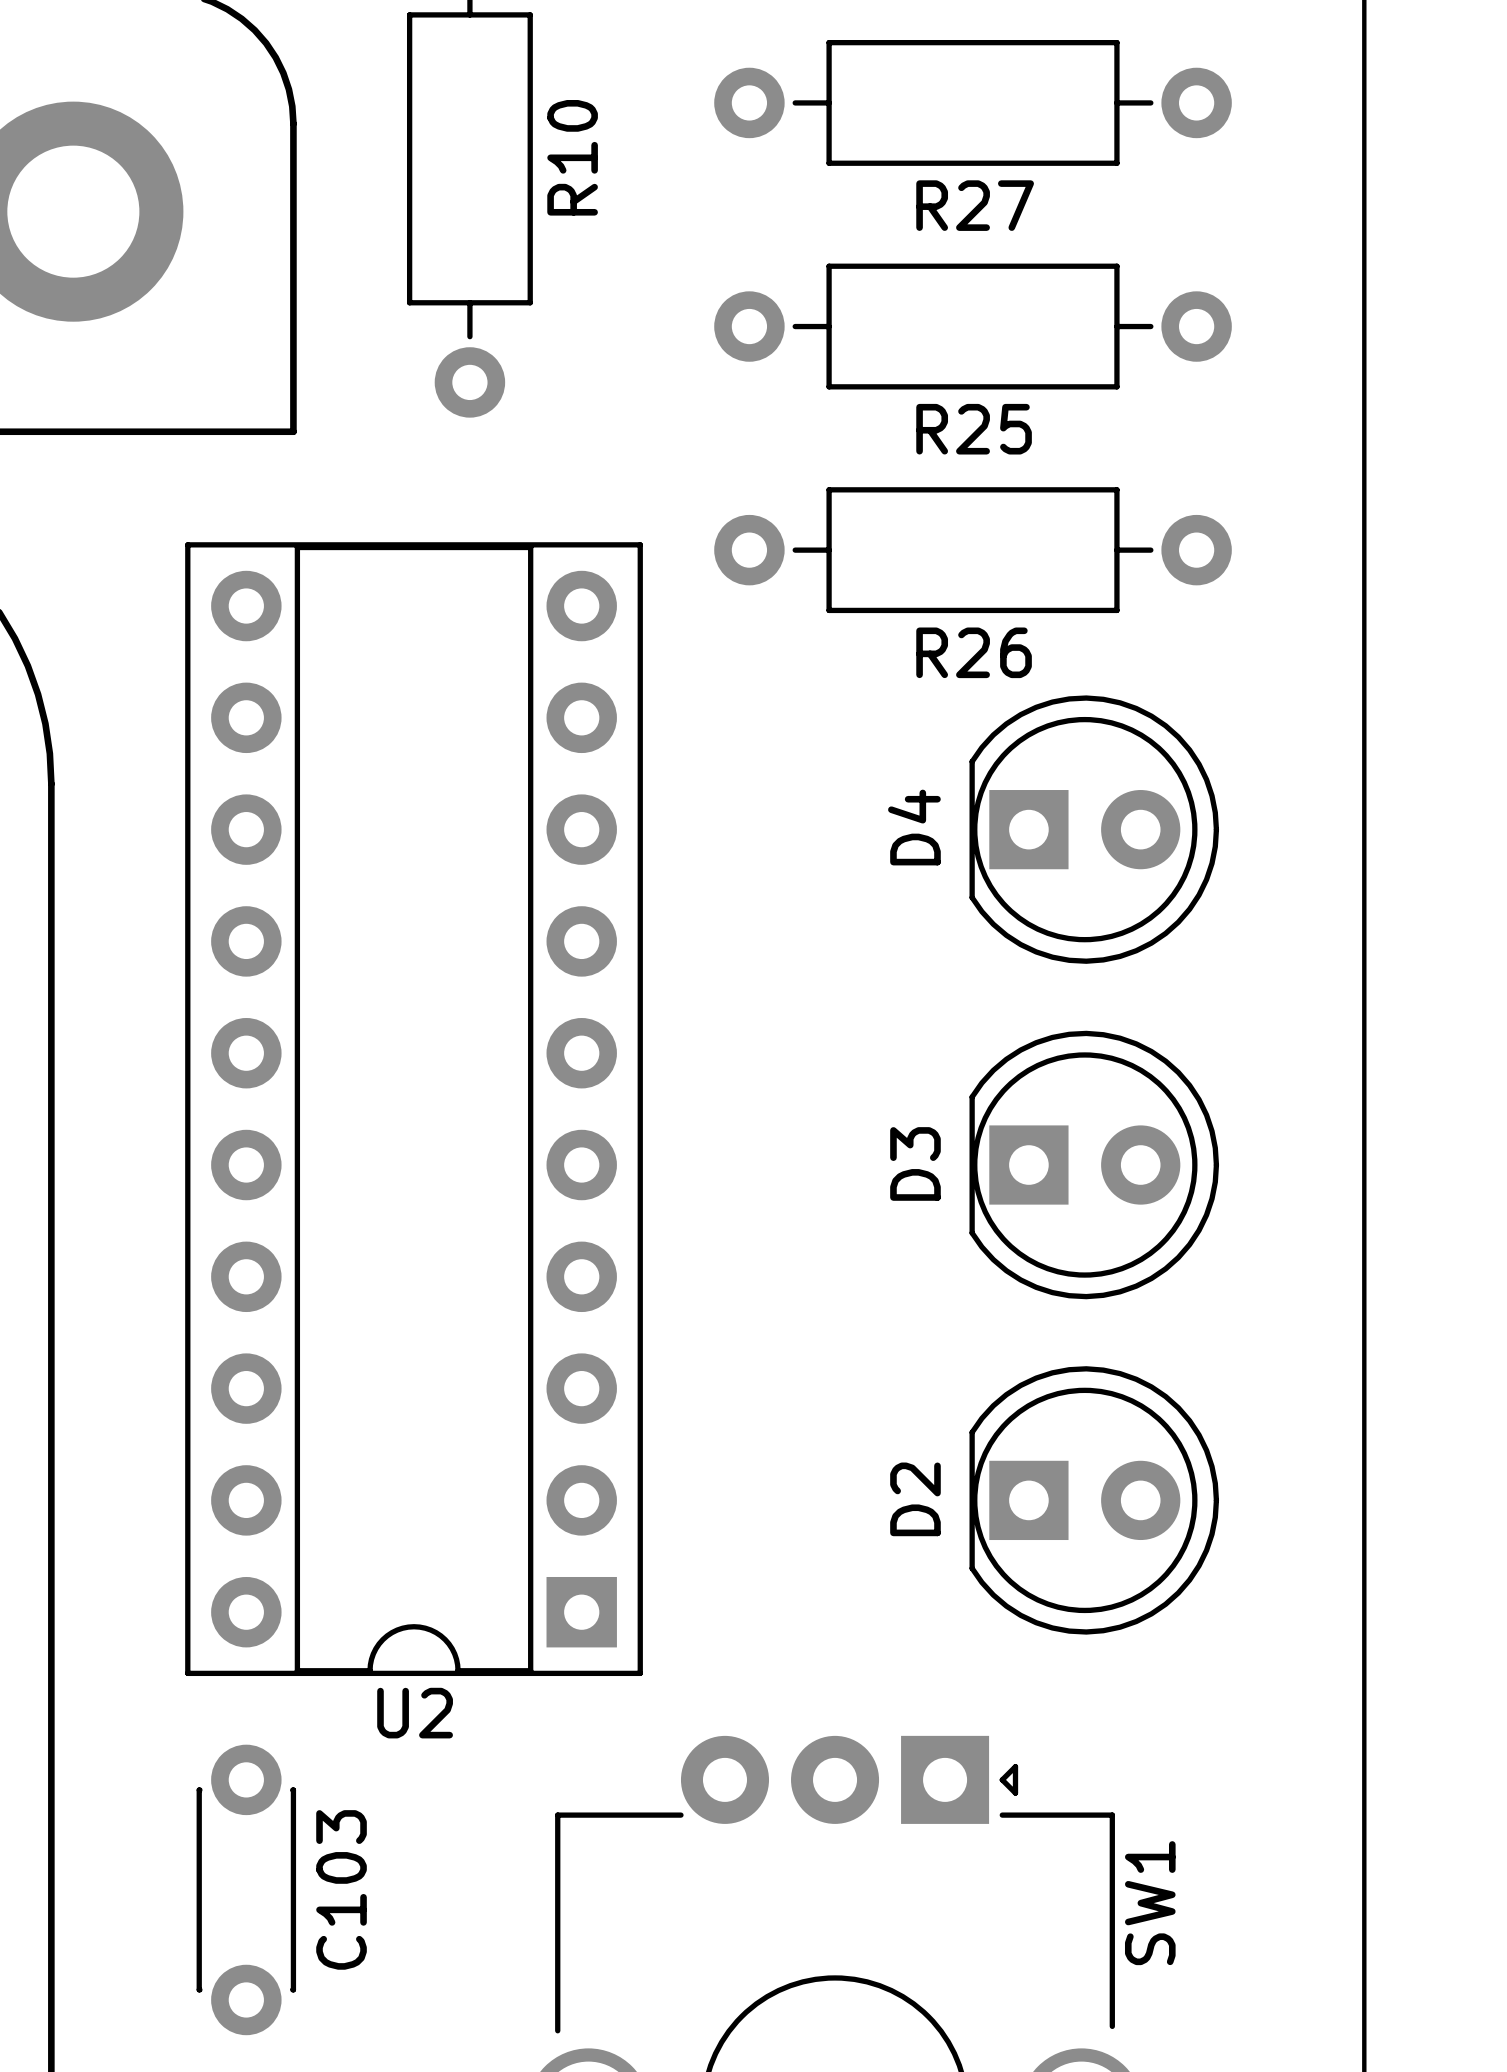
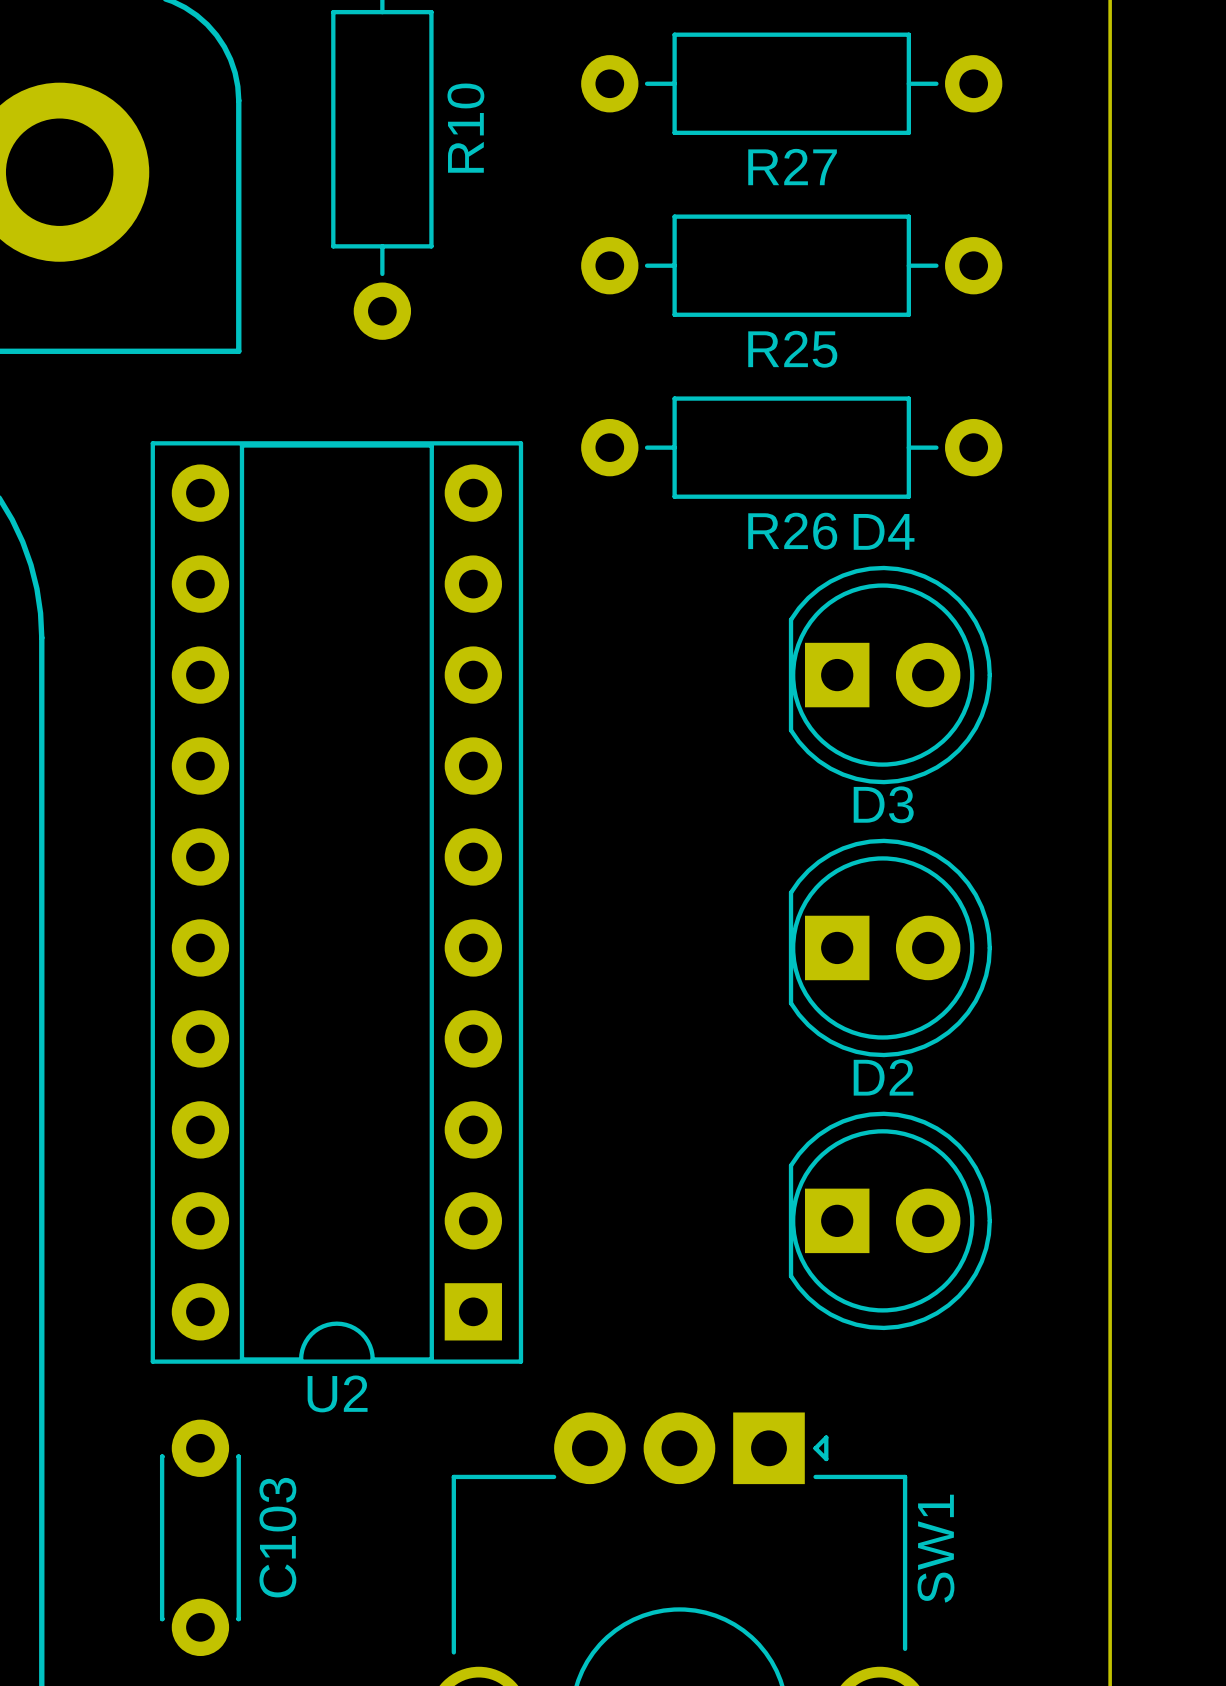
D4 name rotation: 0° (914, 827) -> 90° clockwise (884, 531)
D4 name position: D4 (914, 827) -> D4 (884, 531)
D3 name rotation: 0° (915, 1163) -> 90° clockwise (883, 804)
D3 name position: D3 (915, 1163) -> D3 (883, 804)
D2 name rotation: 0° (915, 1499) -> 90° clockwise (883, 1077)
D2 name position: D2 (915, 1499) -> D2 (883, 1077)

